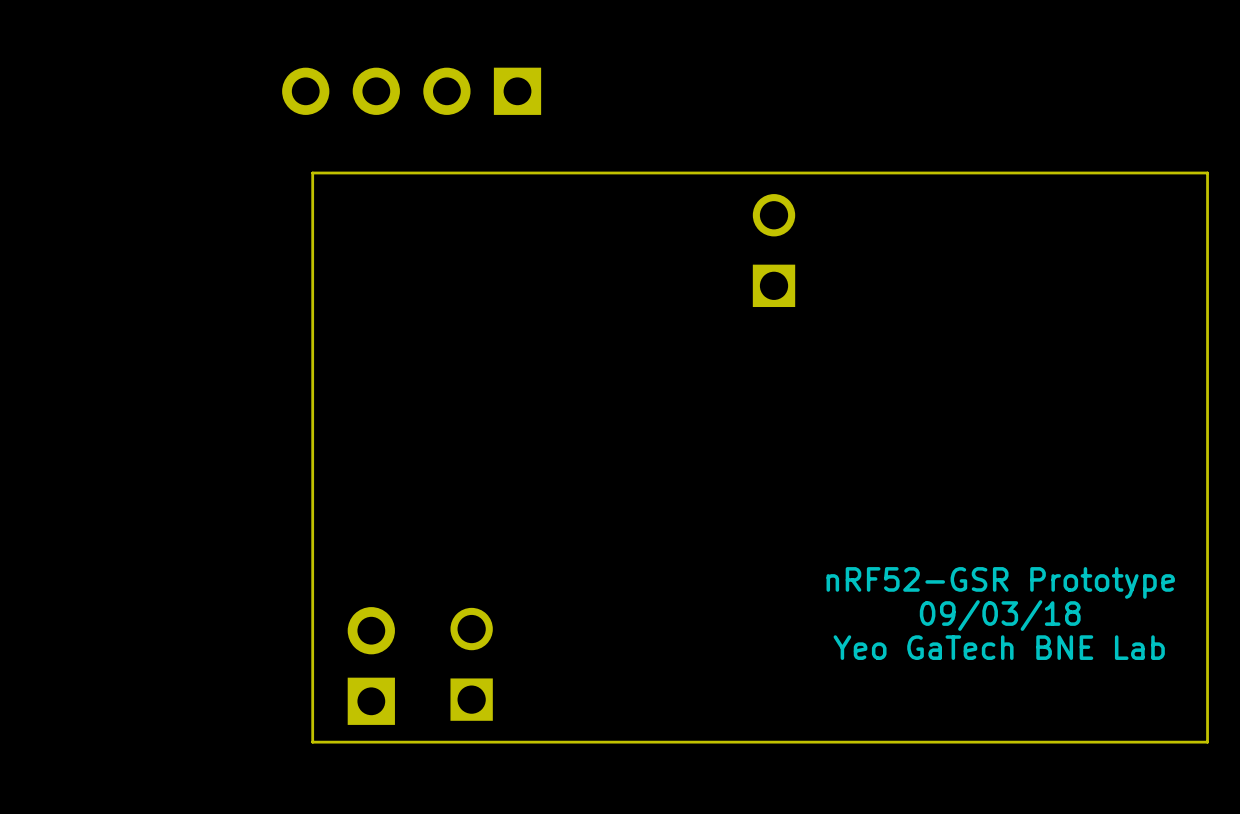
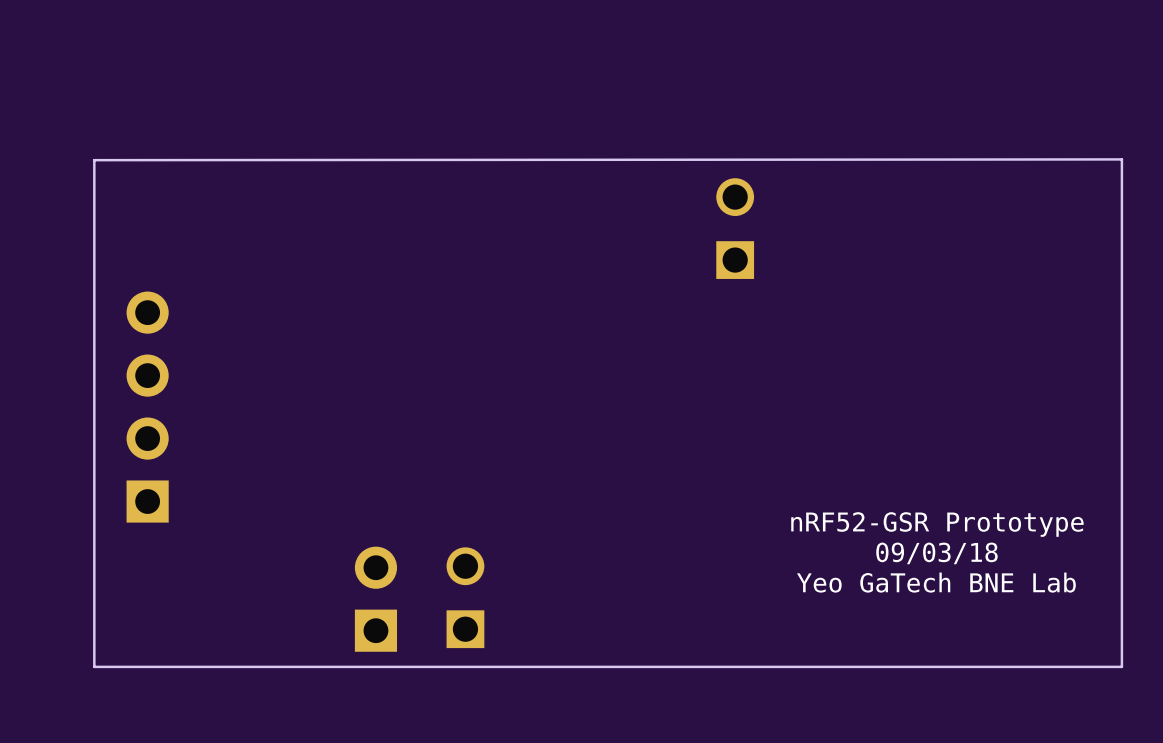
part rotation: 0° (411, 91) -> 90° clockwise (147, 407)
part position: (411, 91) -> (147, 407)
board edge: (1207, 173) (312, 173) (312, 742) (1207, 742) -> (1121, 159) (94, 160) (94, 666) (1121, 666)

